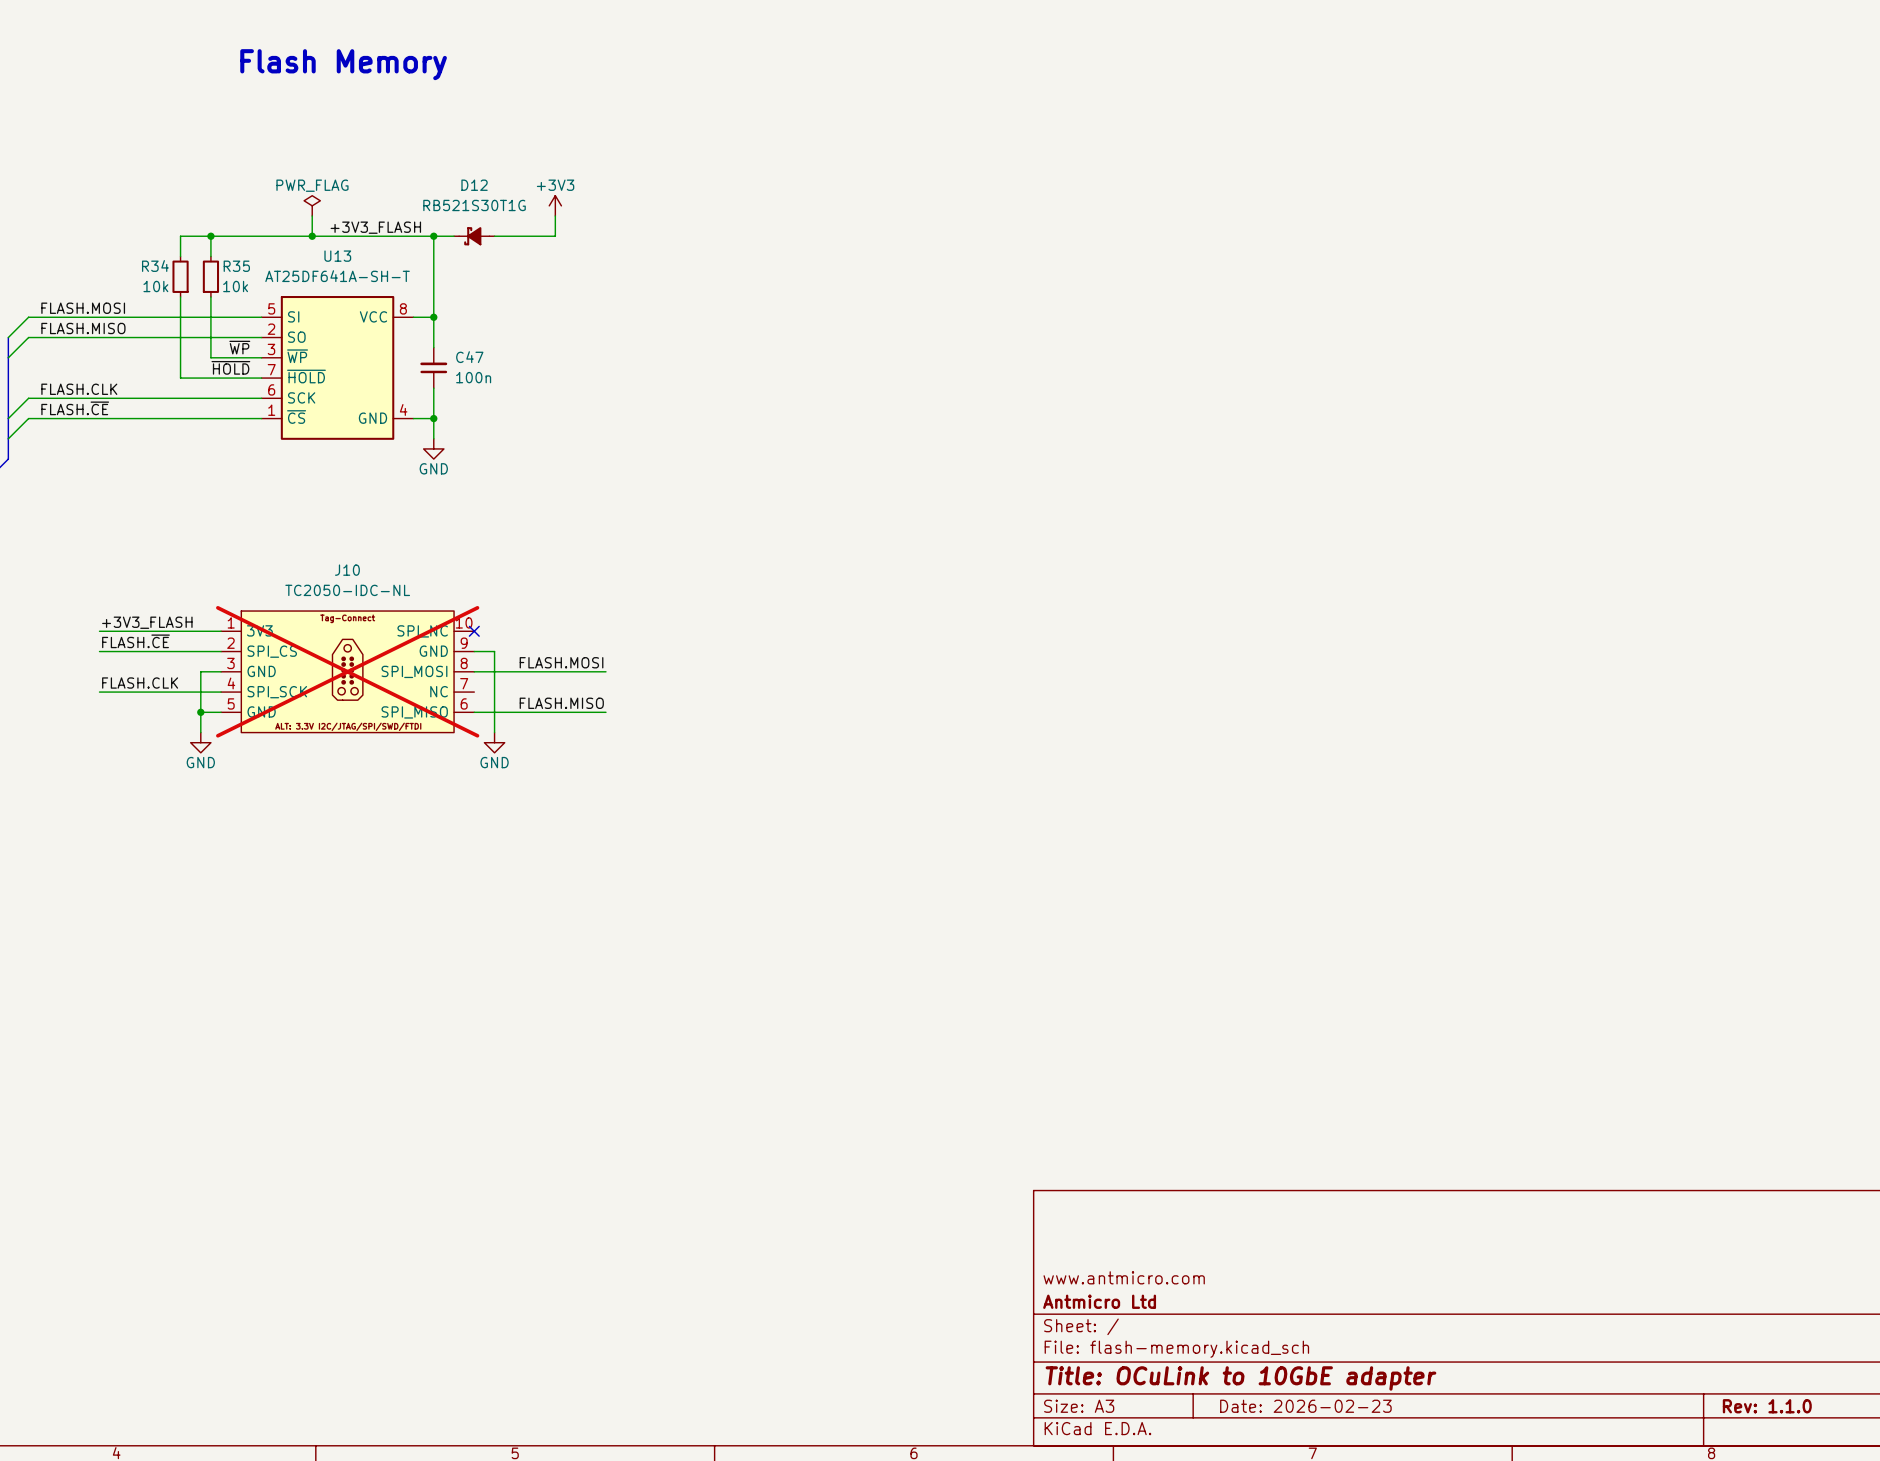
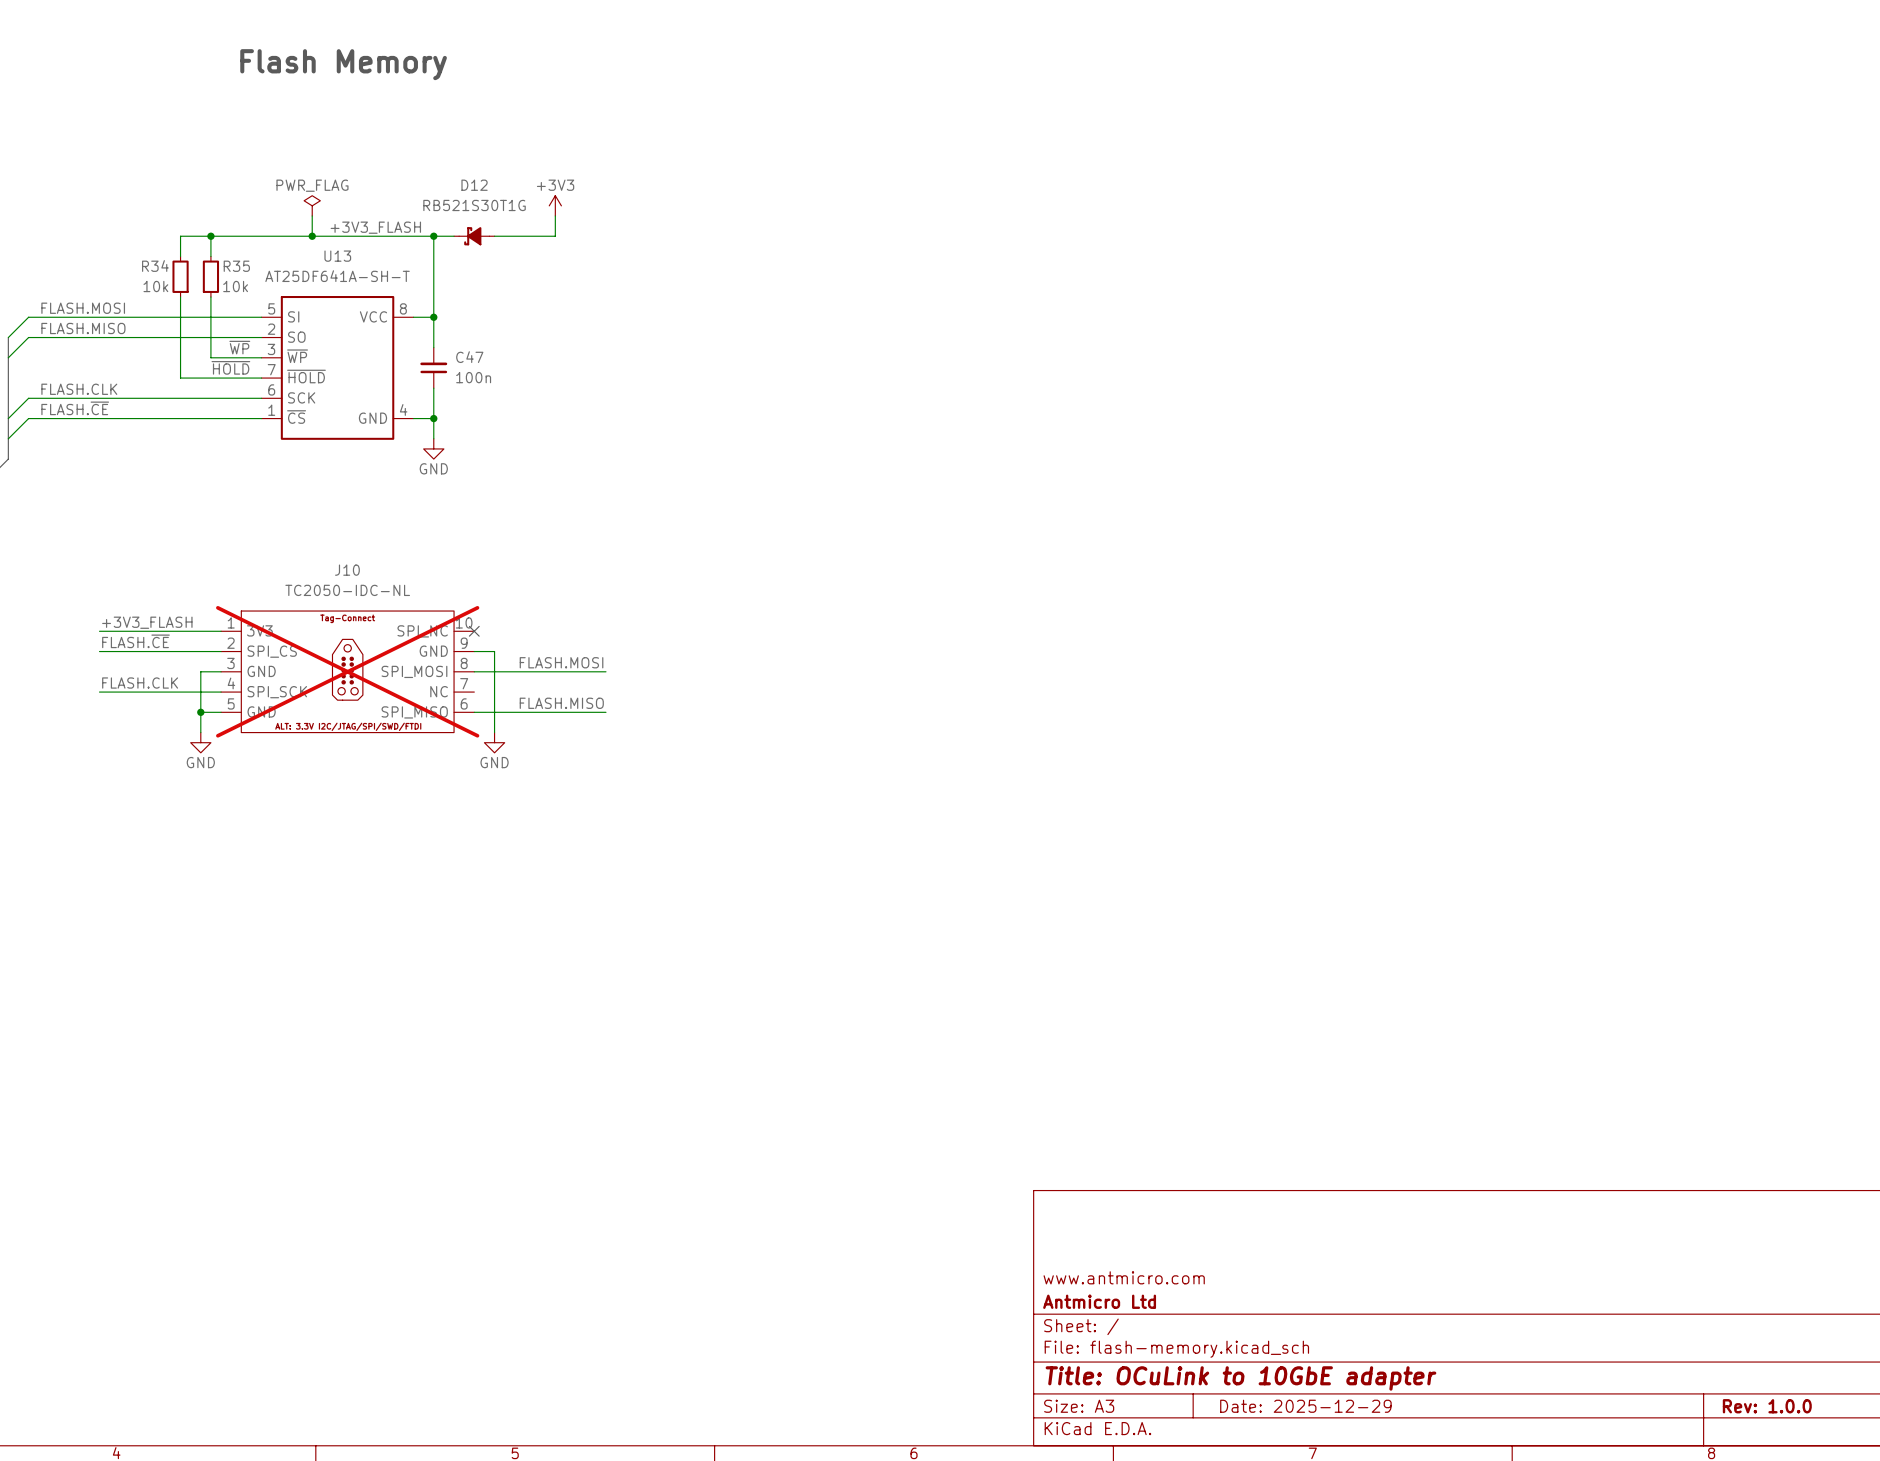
title block: Date: 2026-02-23 (1305, 1406) -> Date: 2025-12-29 (1305, 1406)
title block: Rev: 1.1.0 (1767, 1406) -> Rev: 1.0.0 (1767, 1406)

